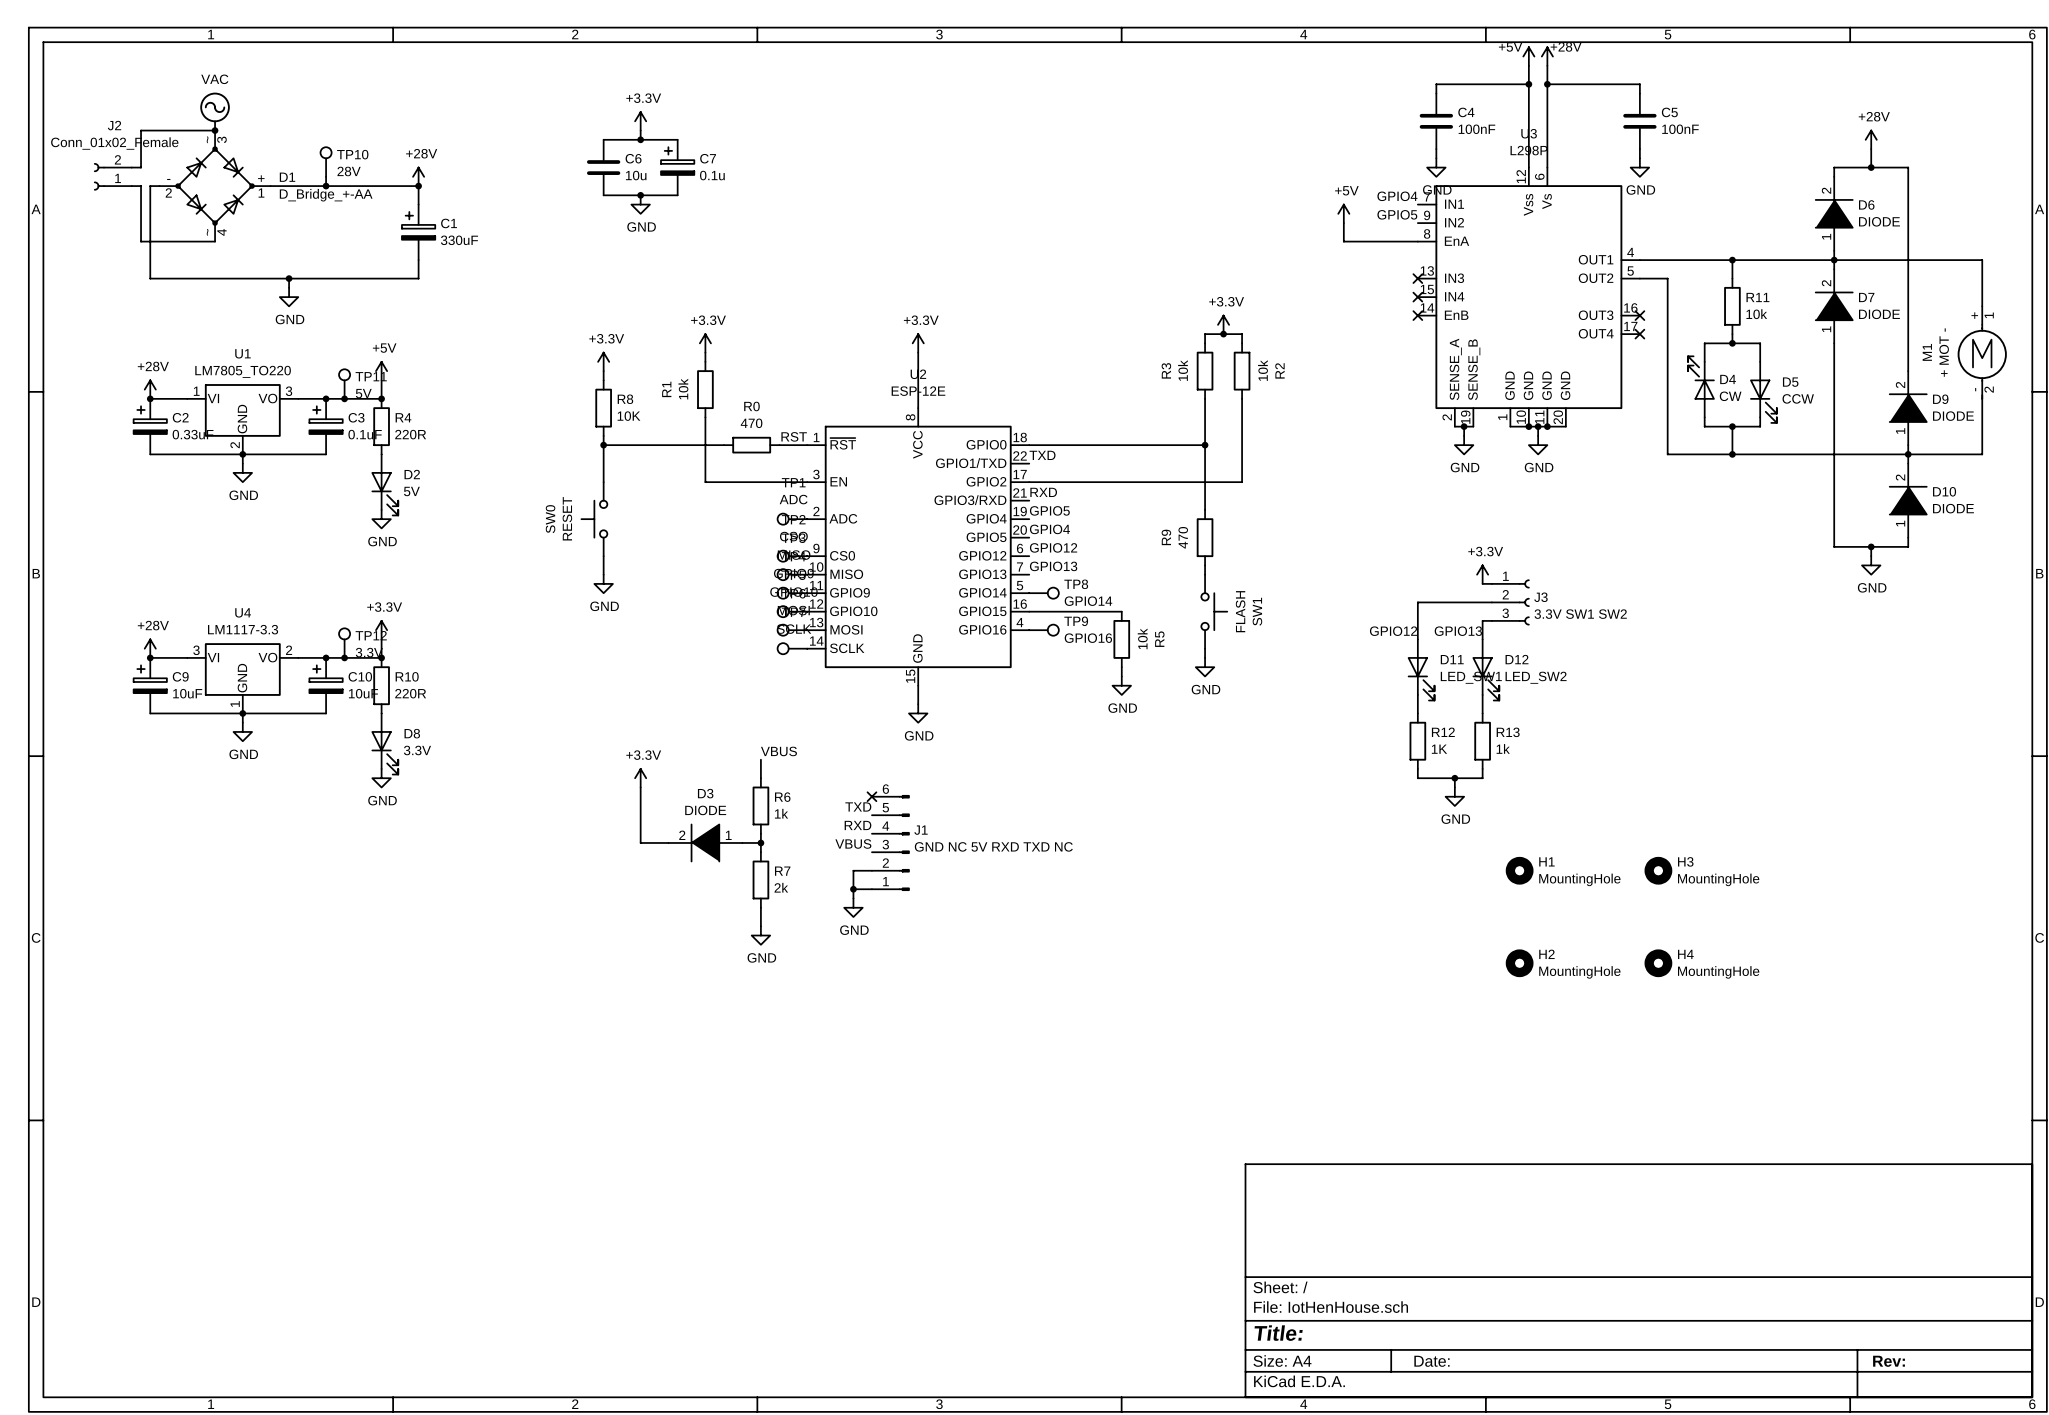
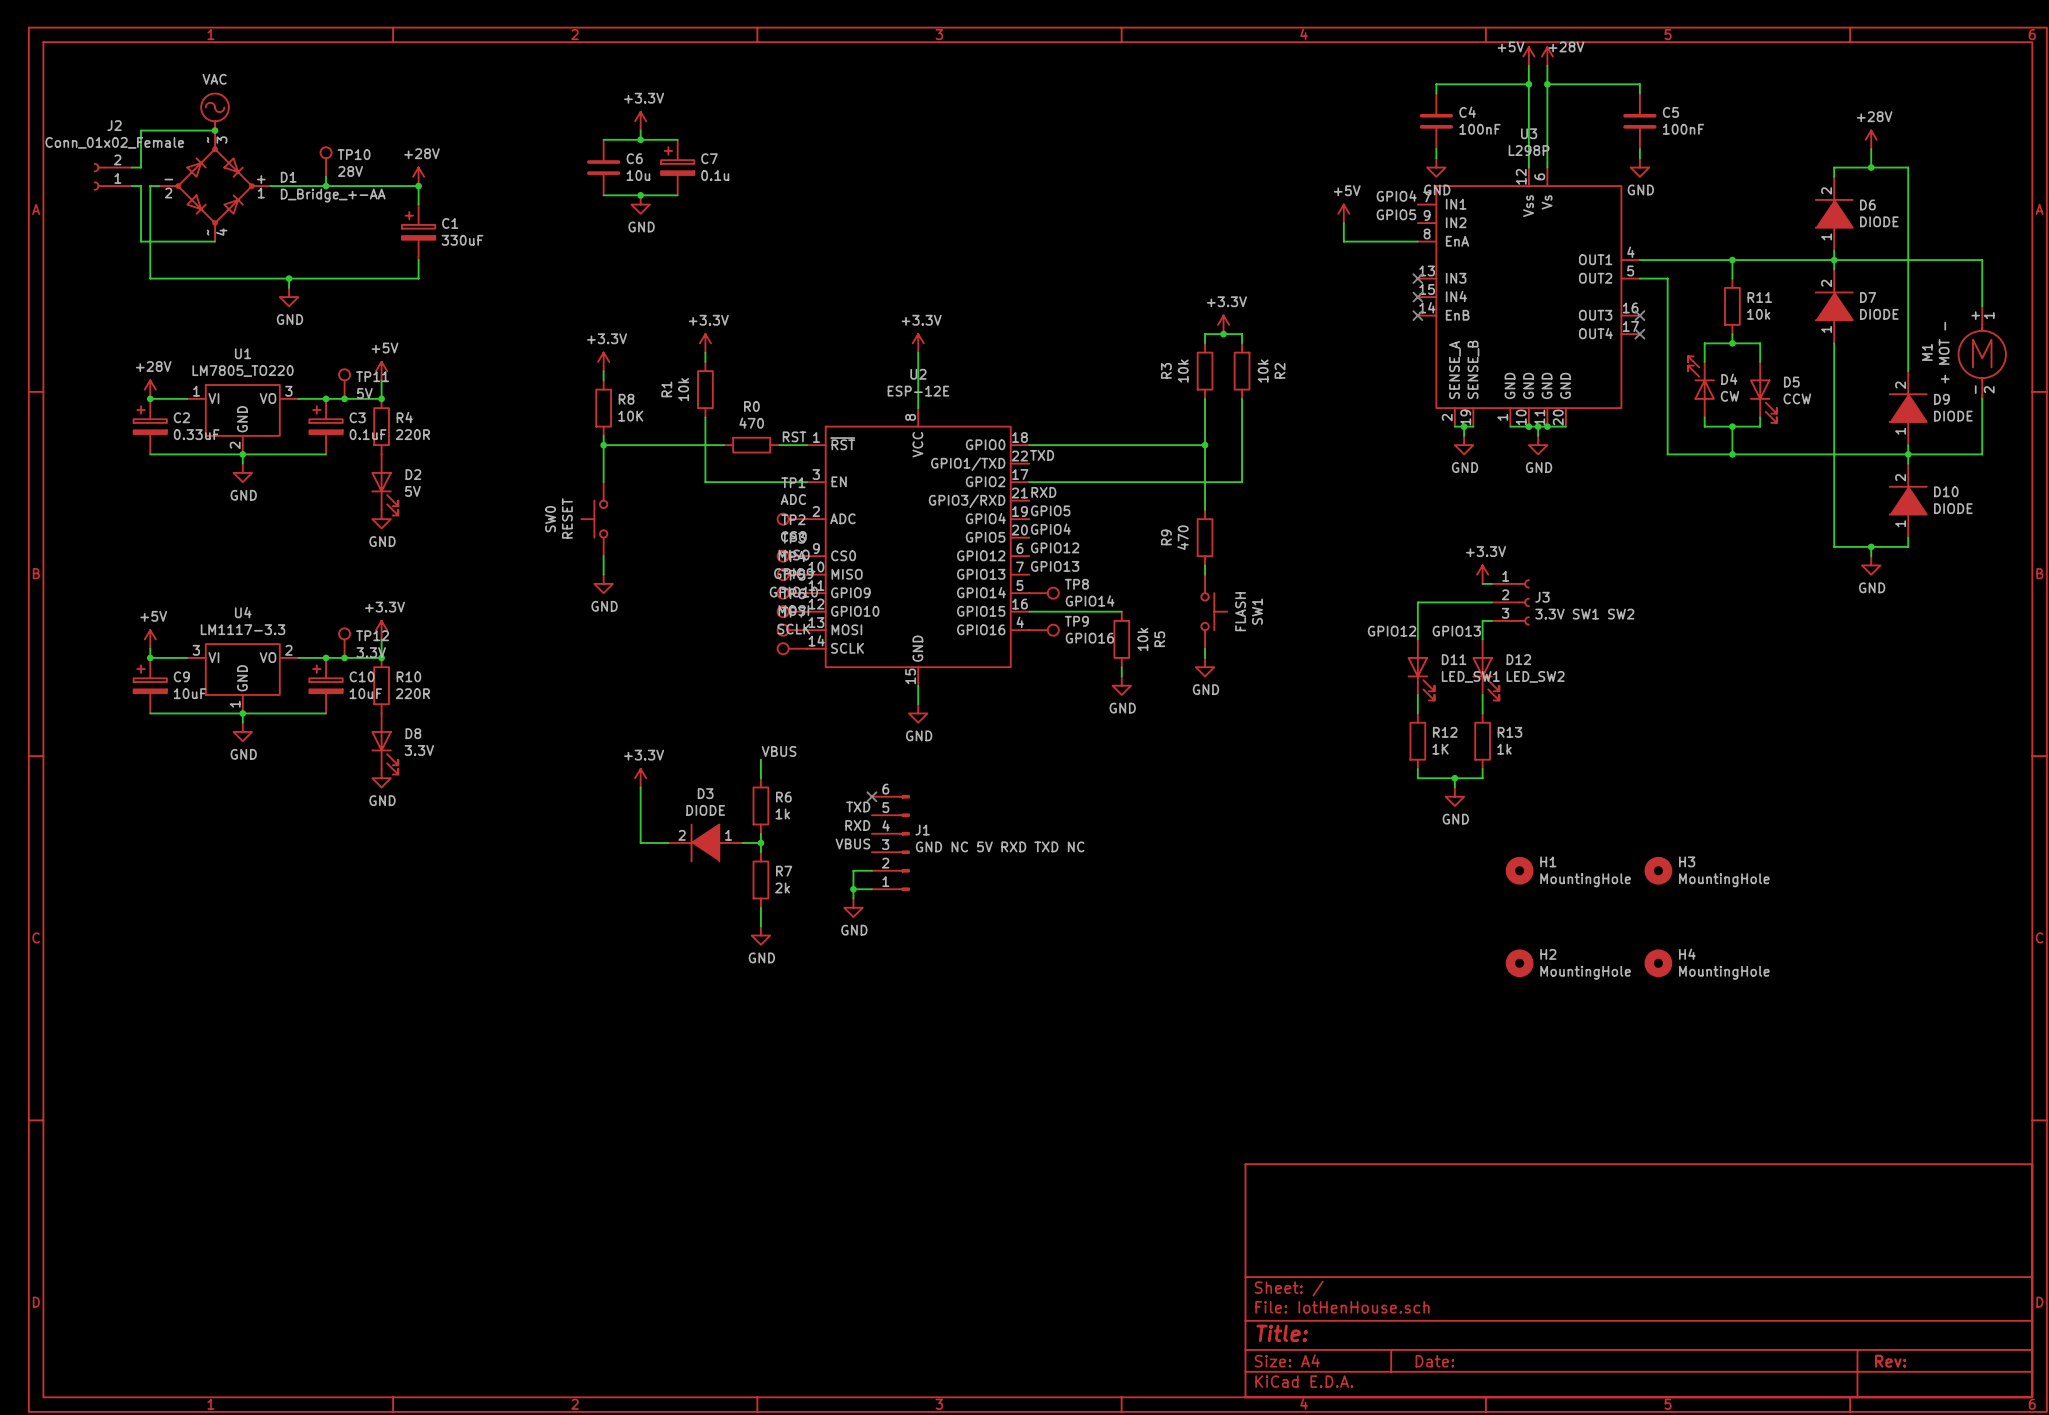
power symbol: none -> +5V (150, 639)
power symbol: +28V (150, 648) -> none

